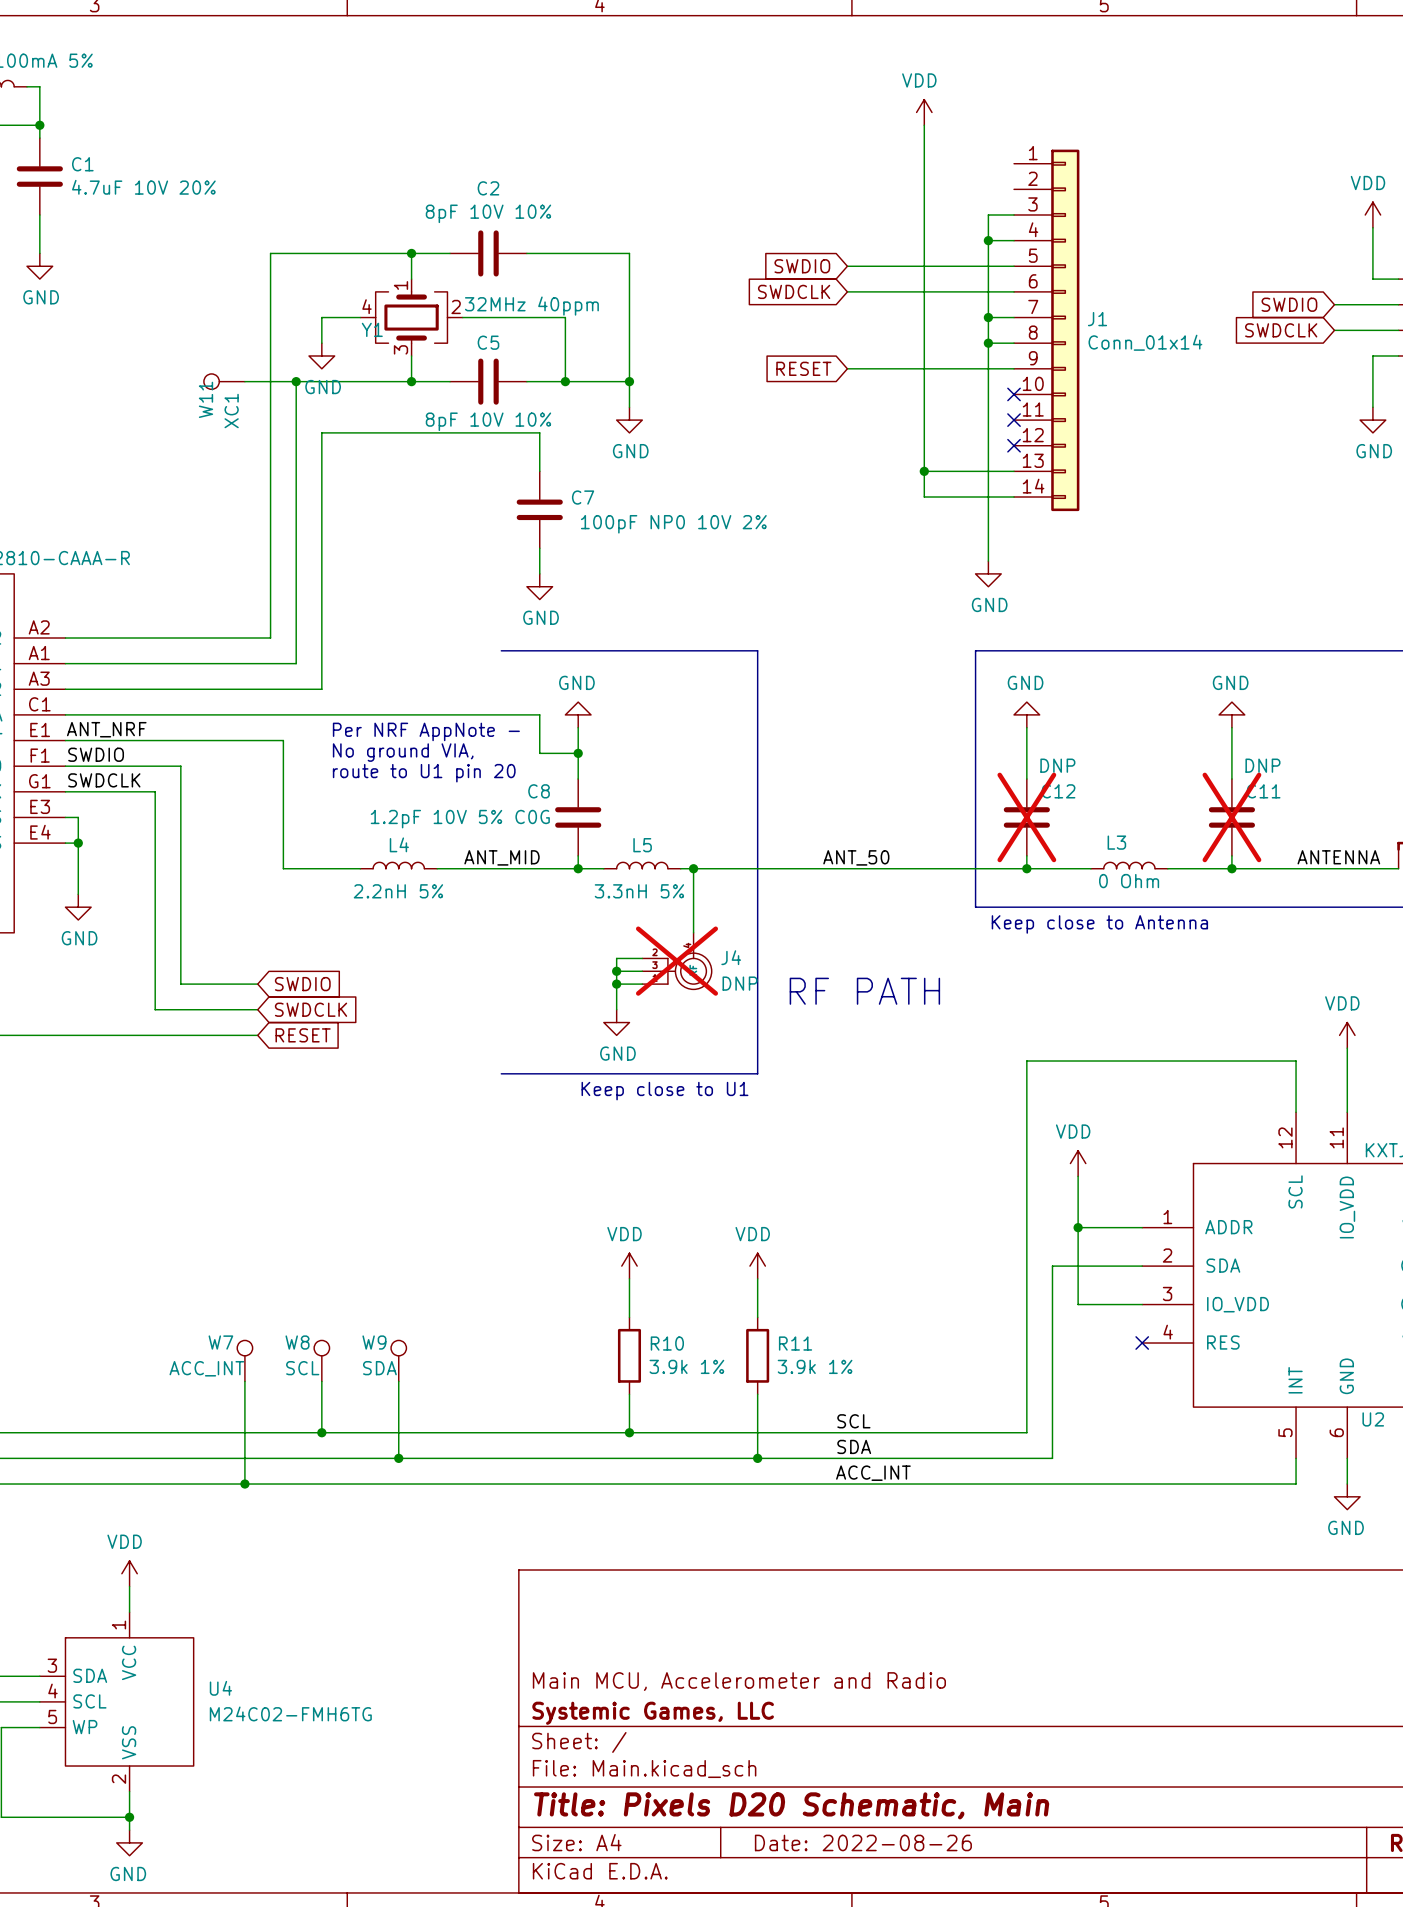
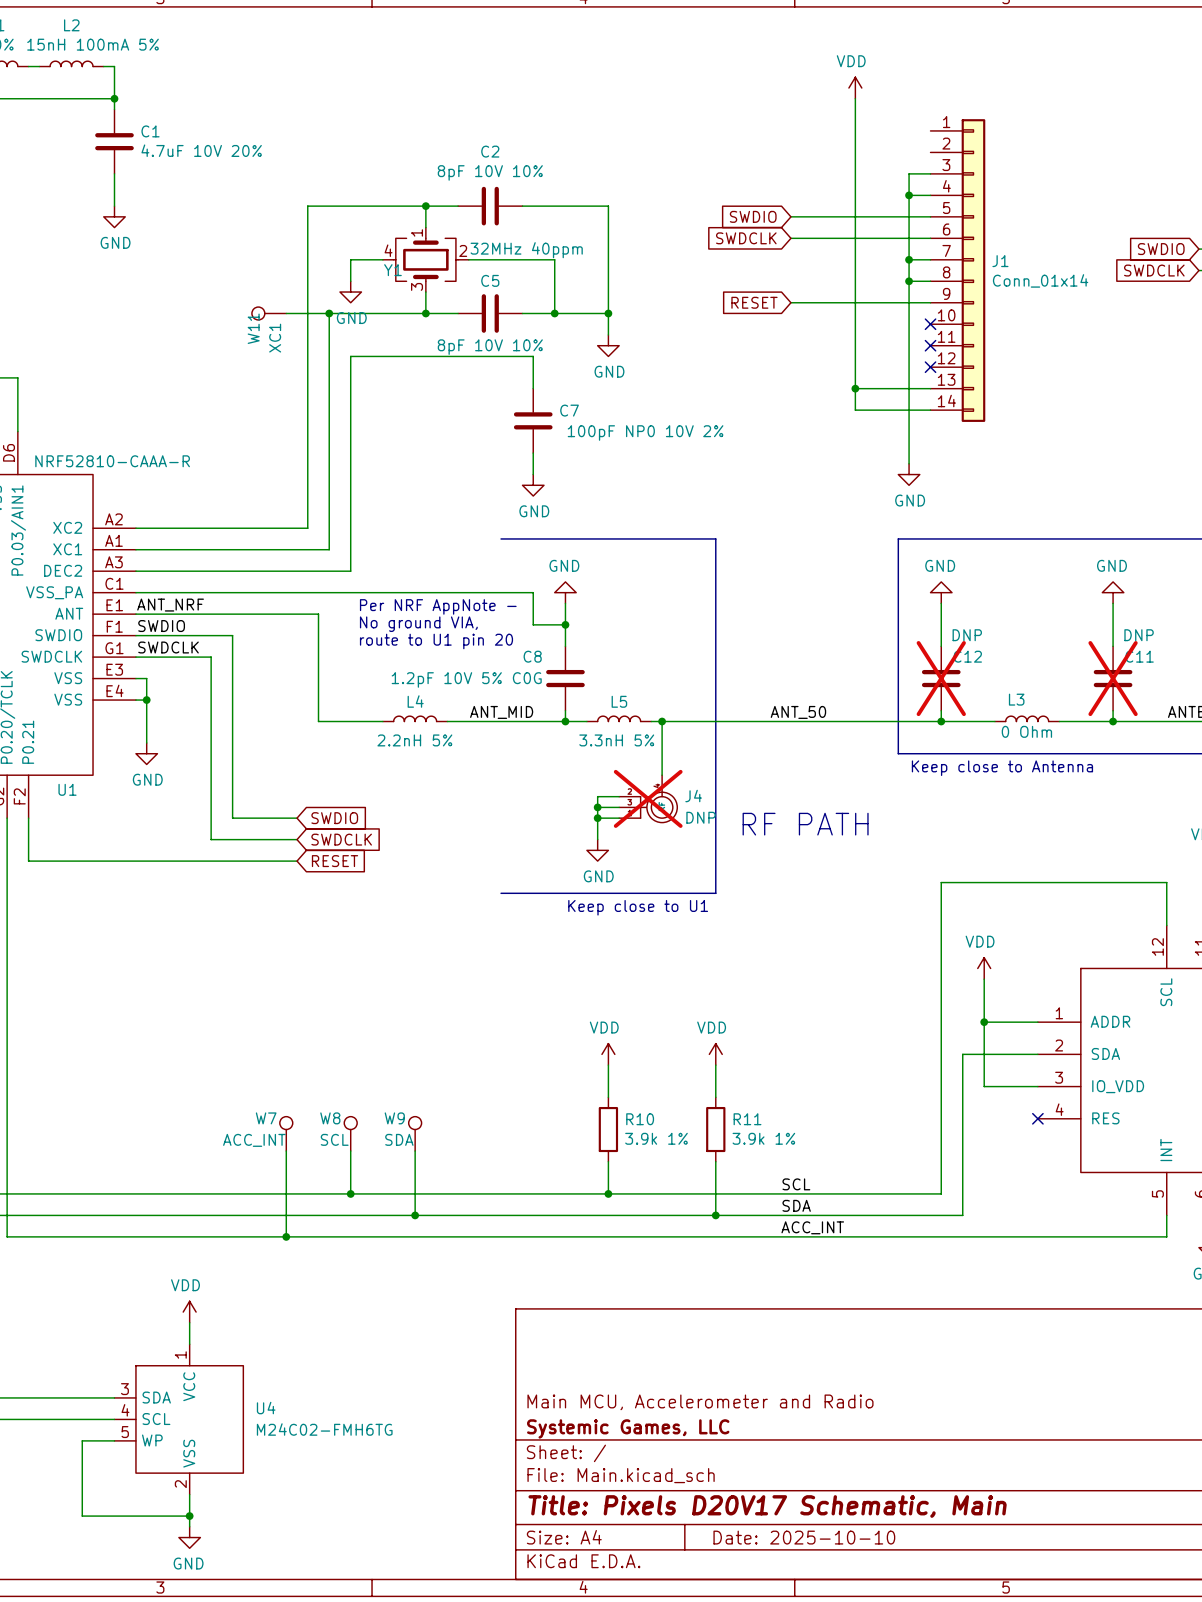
title block: Title: Pixels D20 Schematic, Main (791, 1805) -> Title: Pixels D20V17 Schematic, Main (767, 1506)
title block: Date: 2022-08-26 (863, 1842) -> Date: 2025-10-10 (804, 1537)

